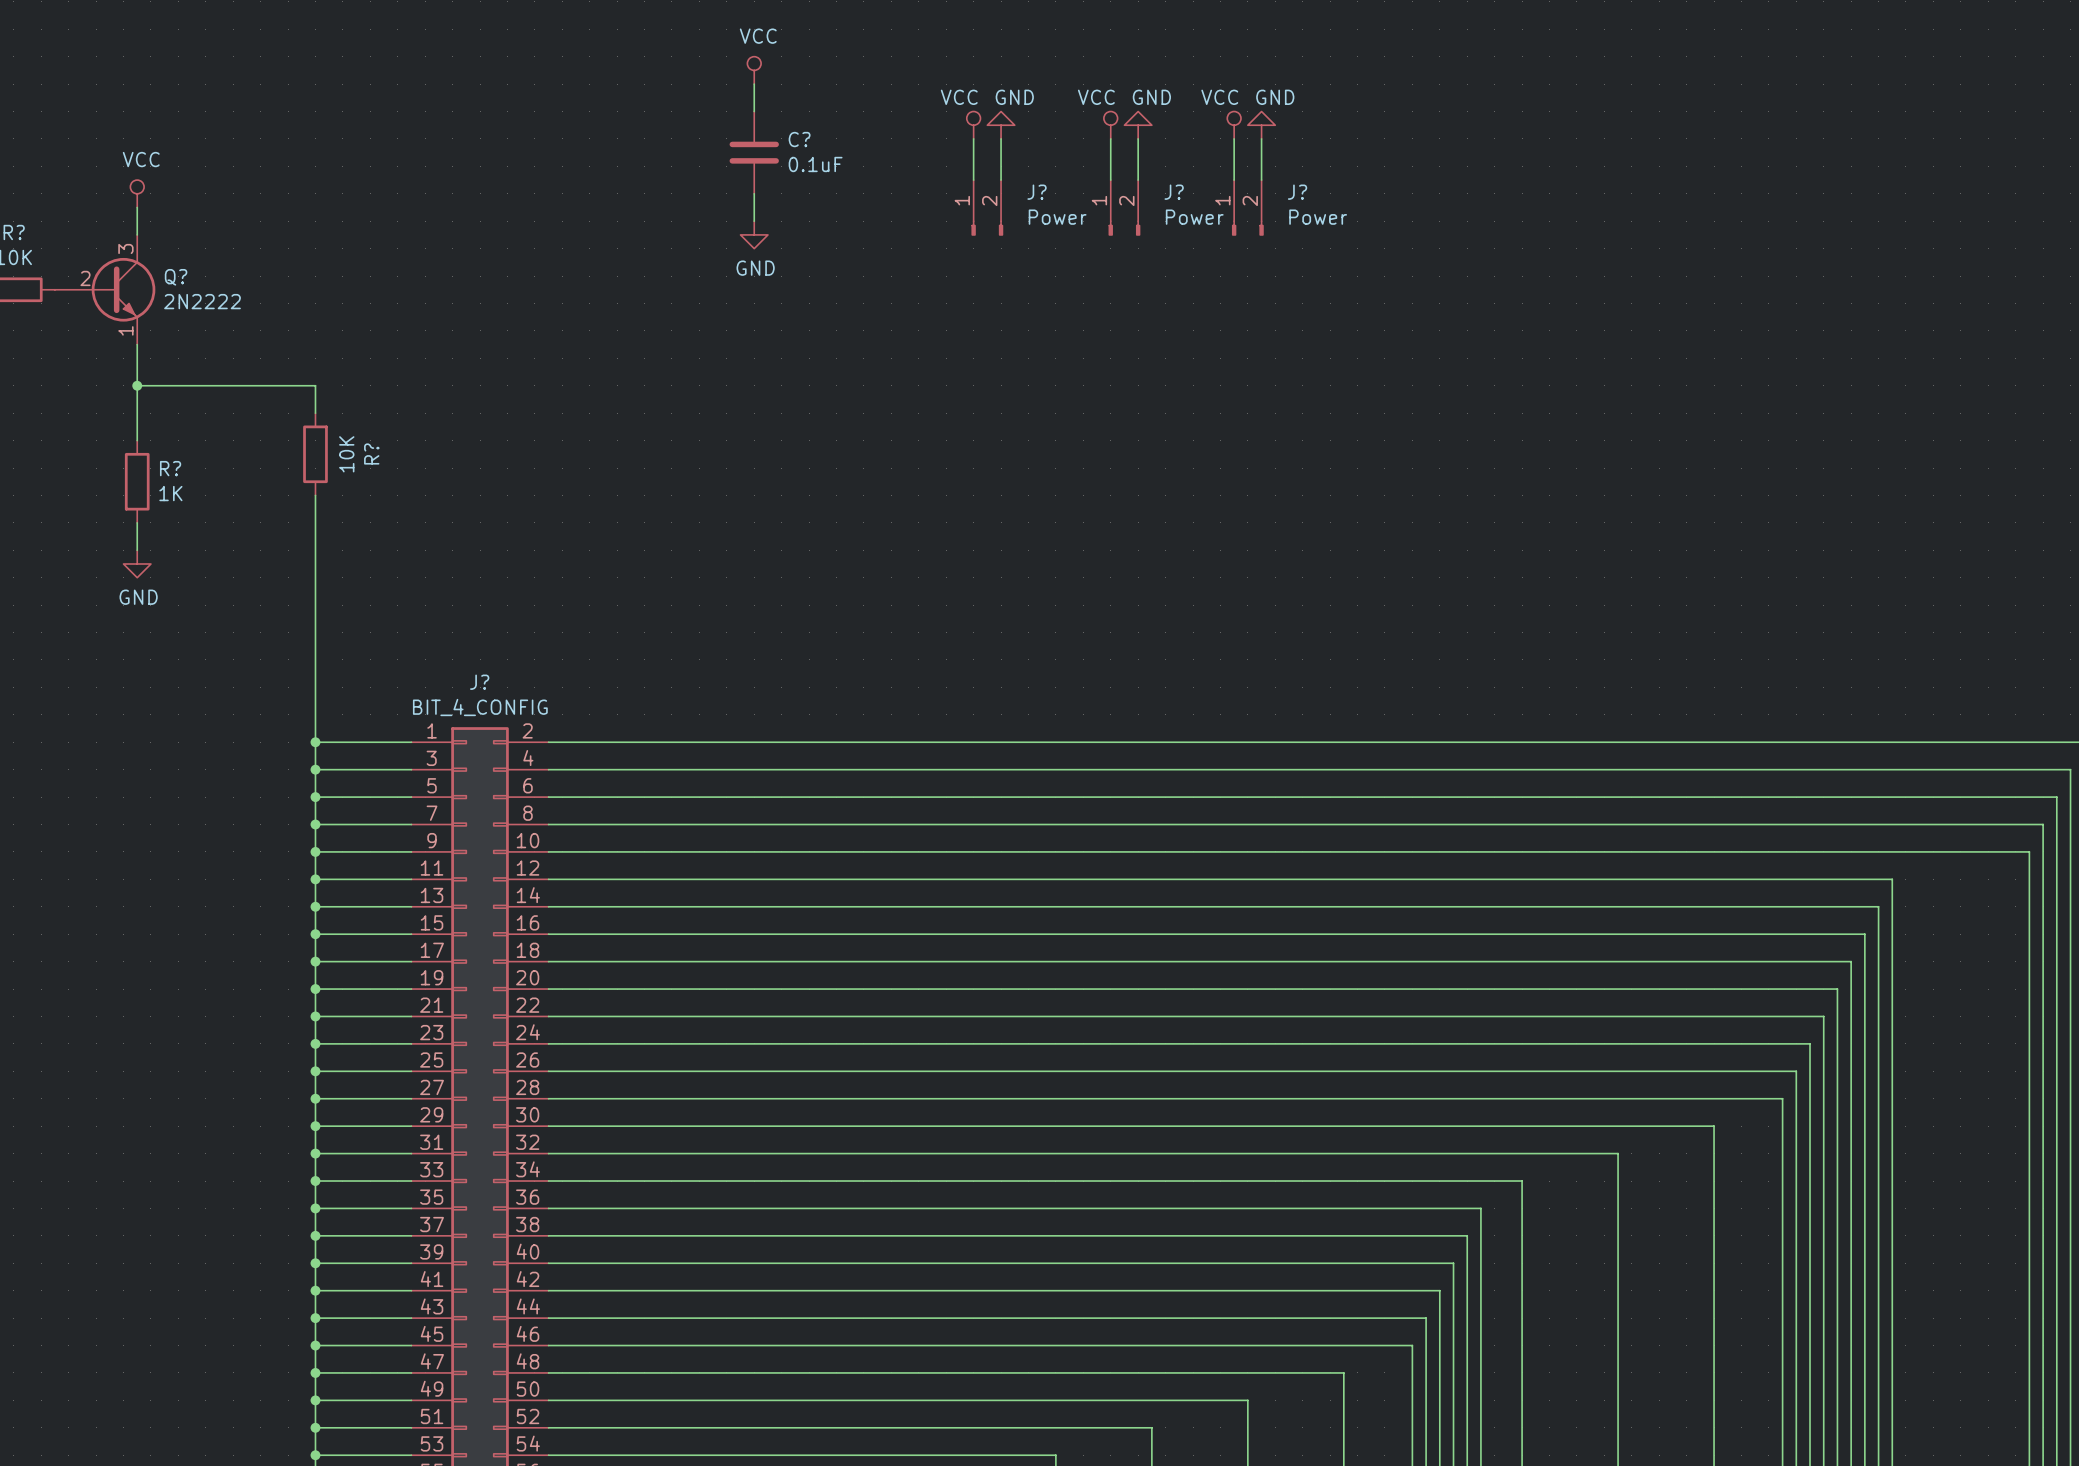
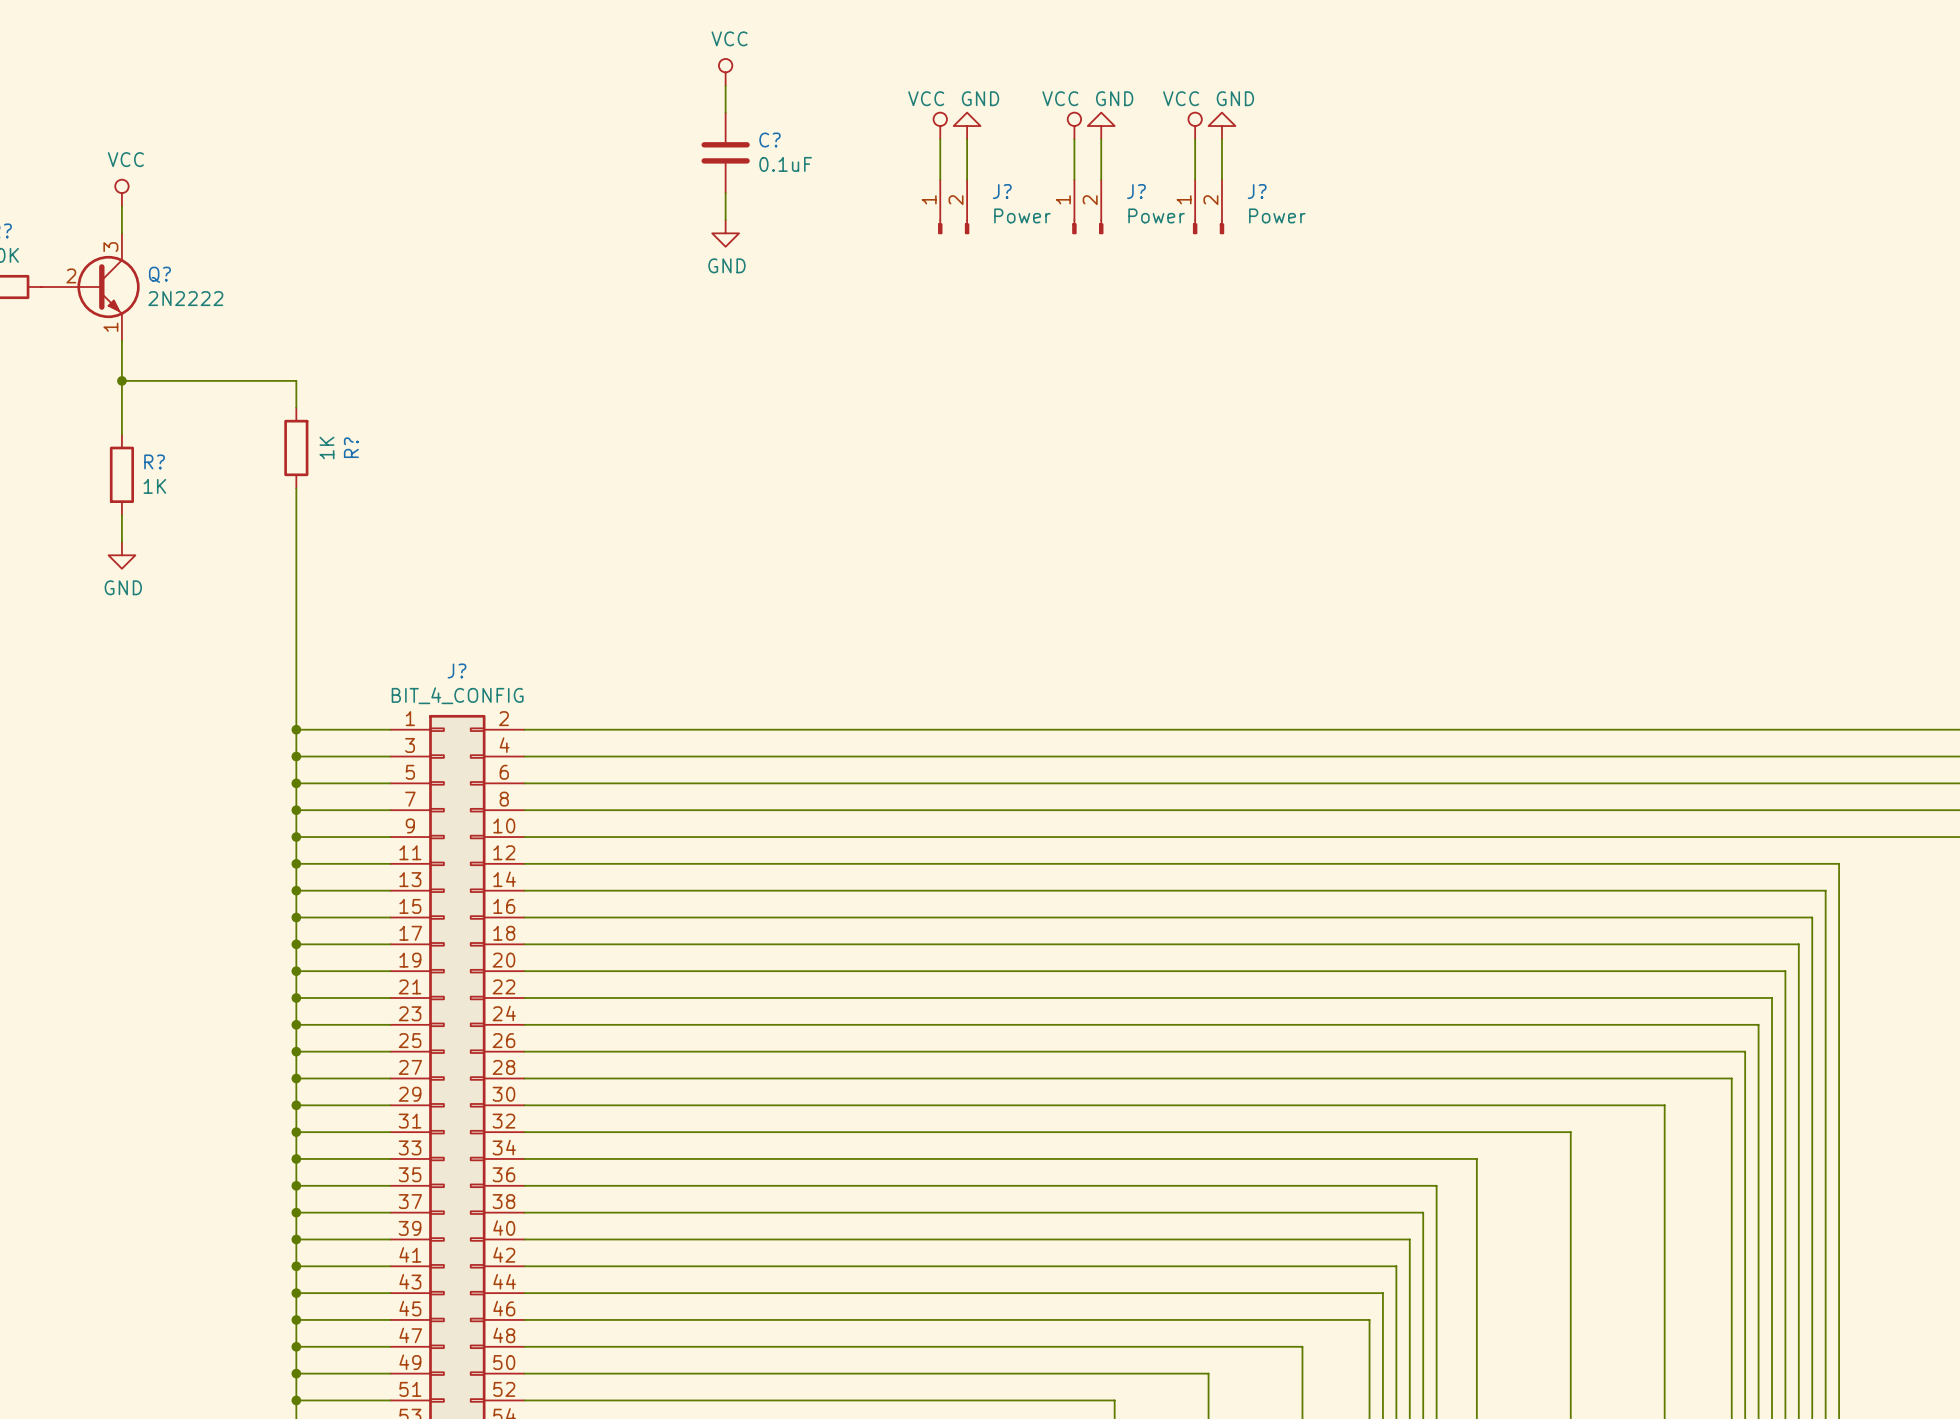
R? value: 10K (346, 454) -> 1K (326, 447)

